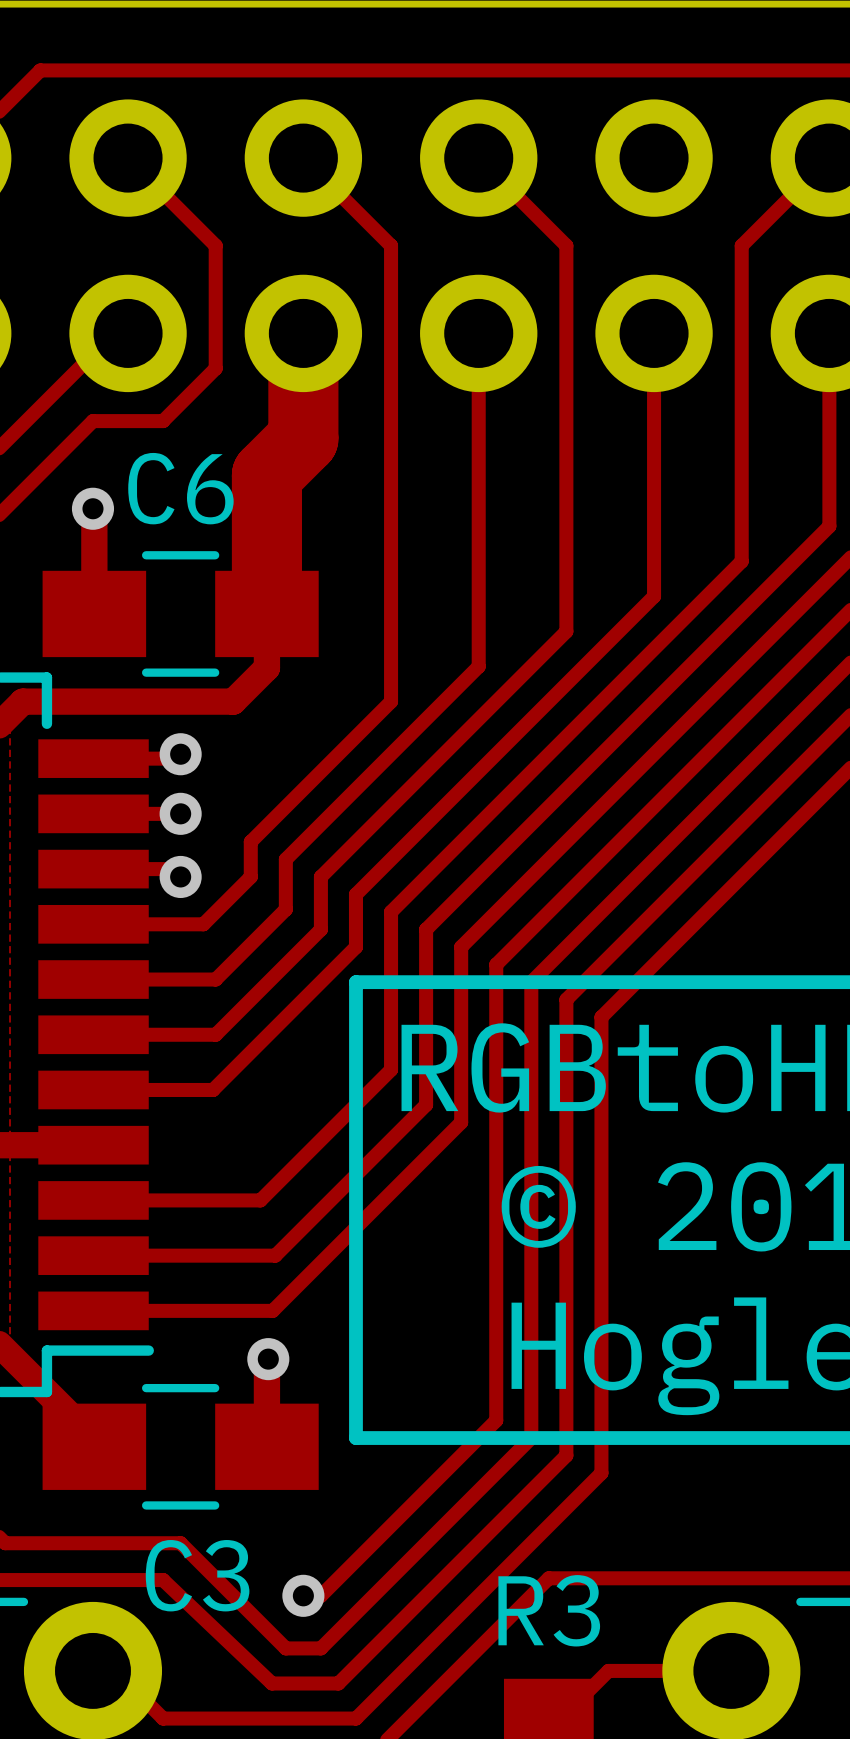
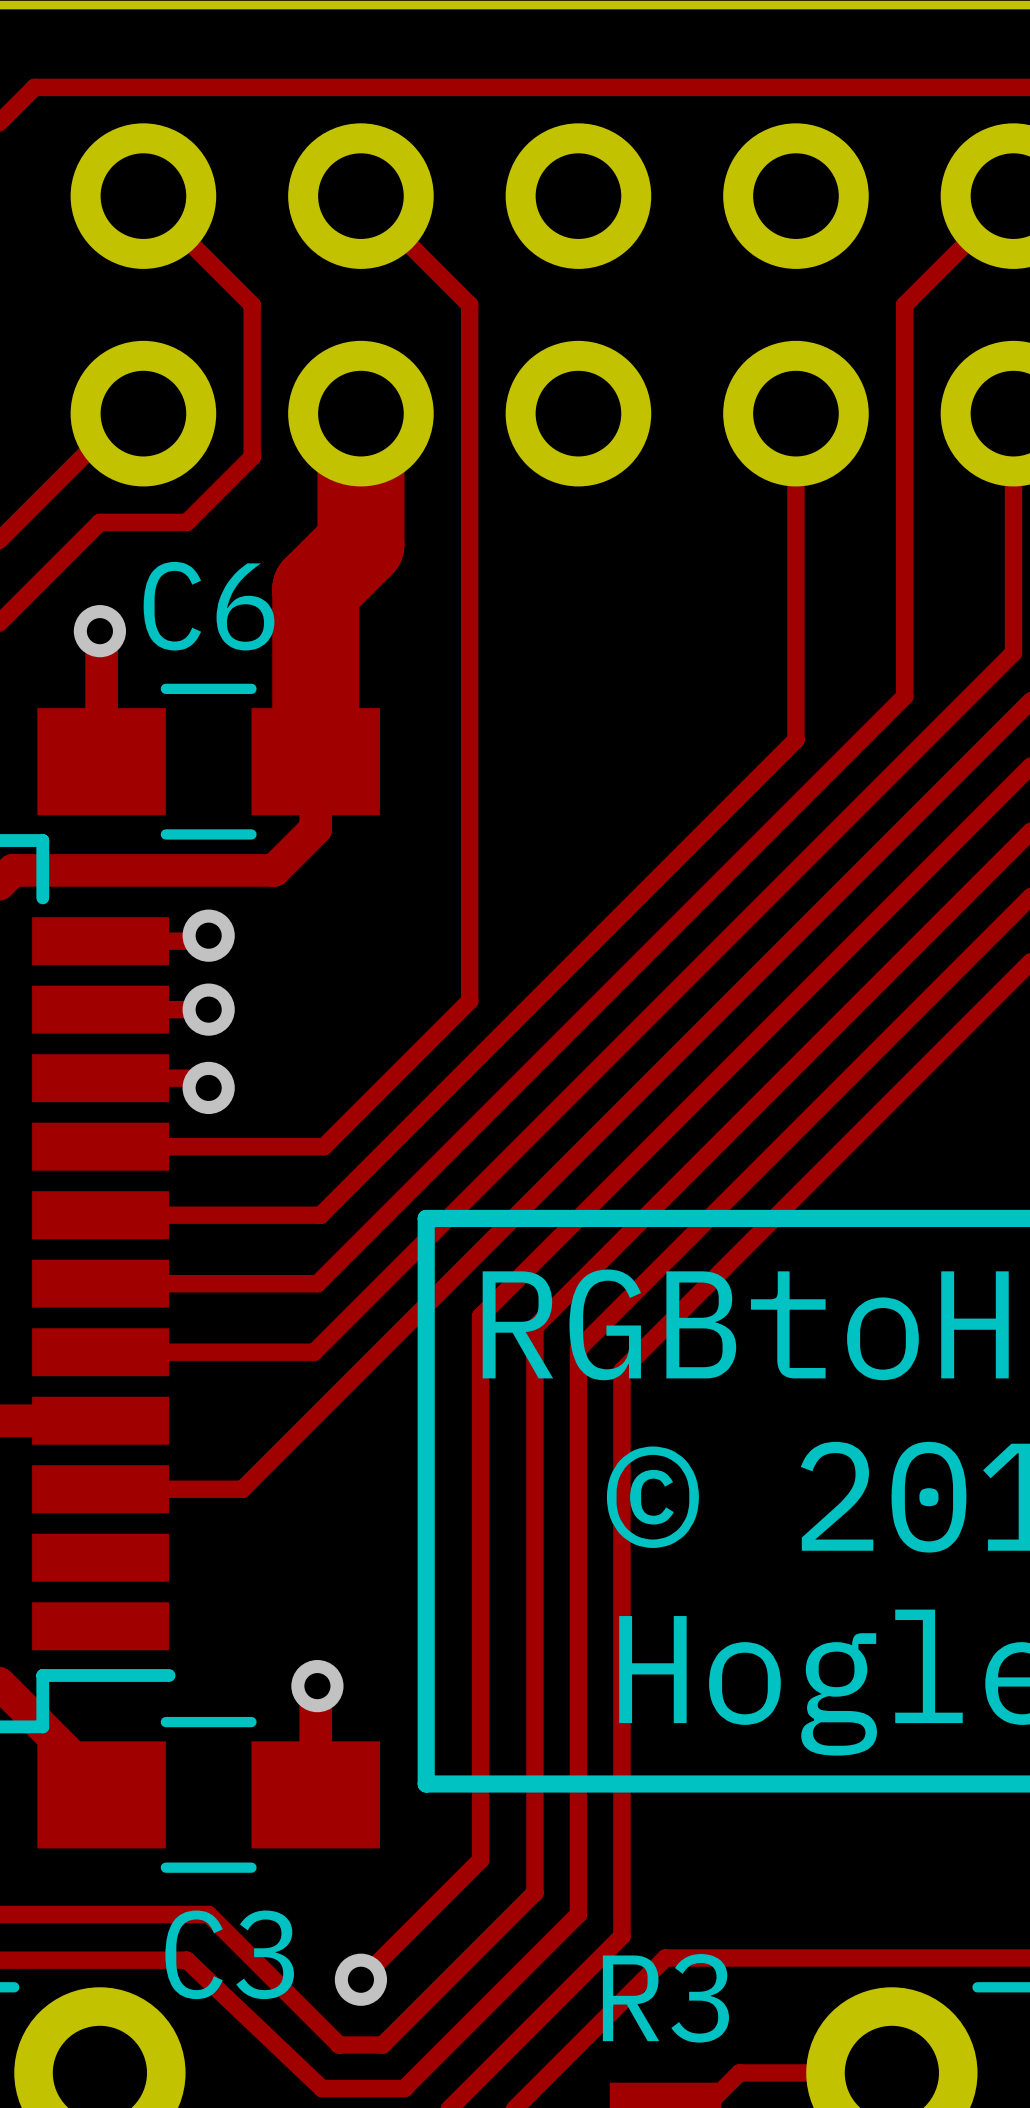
track: (478, 158) (566, 245) (566, 631) (391, 806) -> (469, 870) (469, 1000)
track: (478, 333) (478, 666) (285, 859) (285, 909) (215, 979) -> none
track: (391, 701) (250, 841) (250, 876) (203, 924) -> (382, 1087) (323, 1146) (236, 1146)
track: (320, 876) (320, 929) -> (426, 1109) (382, 1153)
track: (355, 894) (355, 947) -> (469, 1131) (426, 1174)
track: (391, 912) (391, 1069) (260, 1200) (207, 1200) -> (556, 1174) (242, 1489)
track: (426, 929) (426, 1104) (275, 1255) (93, 1255) -> (513, 1153) (314, 1352) (248, 1352)
track: (461, 947) (461, 1122) (272, 1310) (93, 1310) -> none
track: (496, 964) (496, 1420) (320, 1595) (303, 1595) -> (600, 1196) (480, 1316) (480, 1860) (360, 1979)
track: (270, 979) (215, 1034) -> (320, 1215) (252, 1215)
track: (531, 982) (531, 1438) (443, 1525) -> (643, 1218) (534, 1327) (534, 1892)
track: (566, 999) (566, 1455) (478, 1543) -> (687, 1240) (578, 1348) (578, 1914)
track: (601, 1017) (601, 1473) (513, 1560) -> (730, 1261) (621, 1370) (621, 1936)
track: (268, 1034) (213, 1089) -> (317, 1283) (252, 1283)

